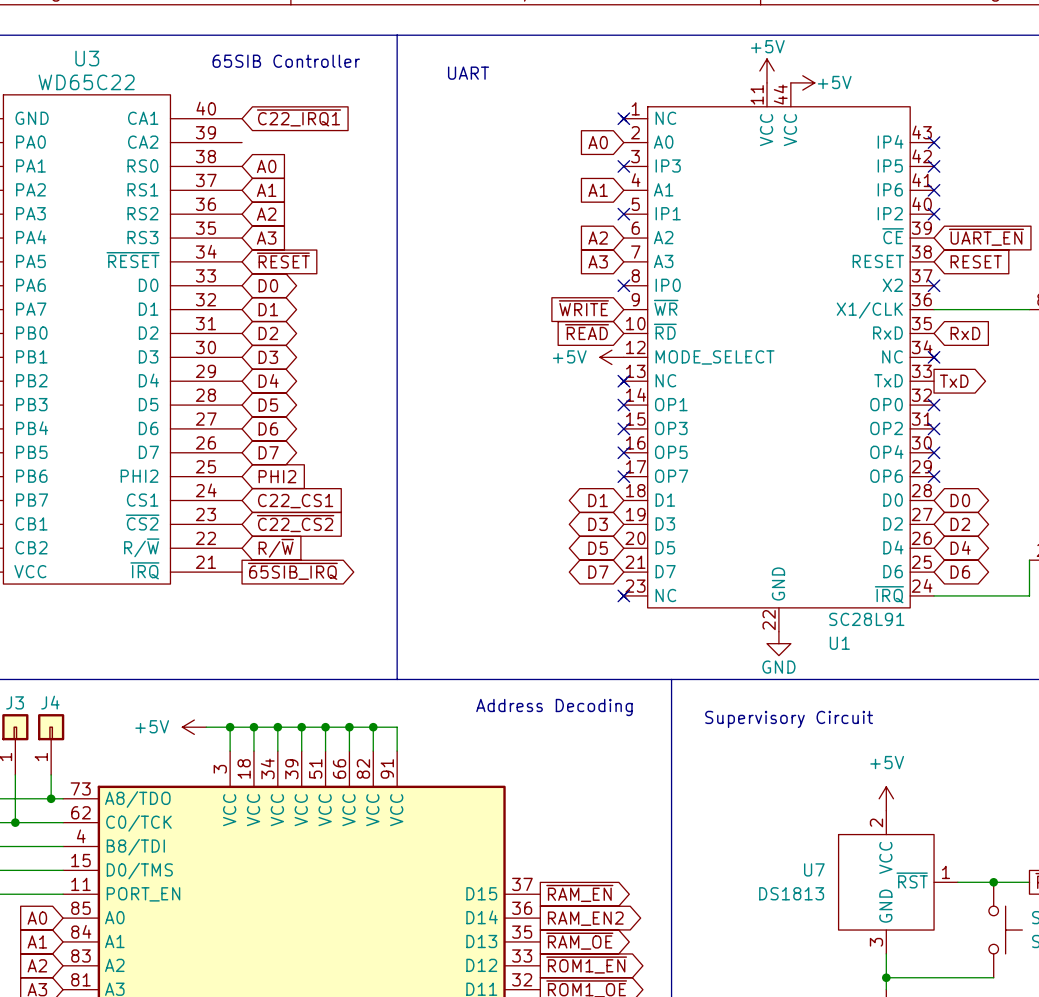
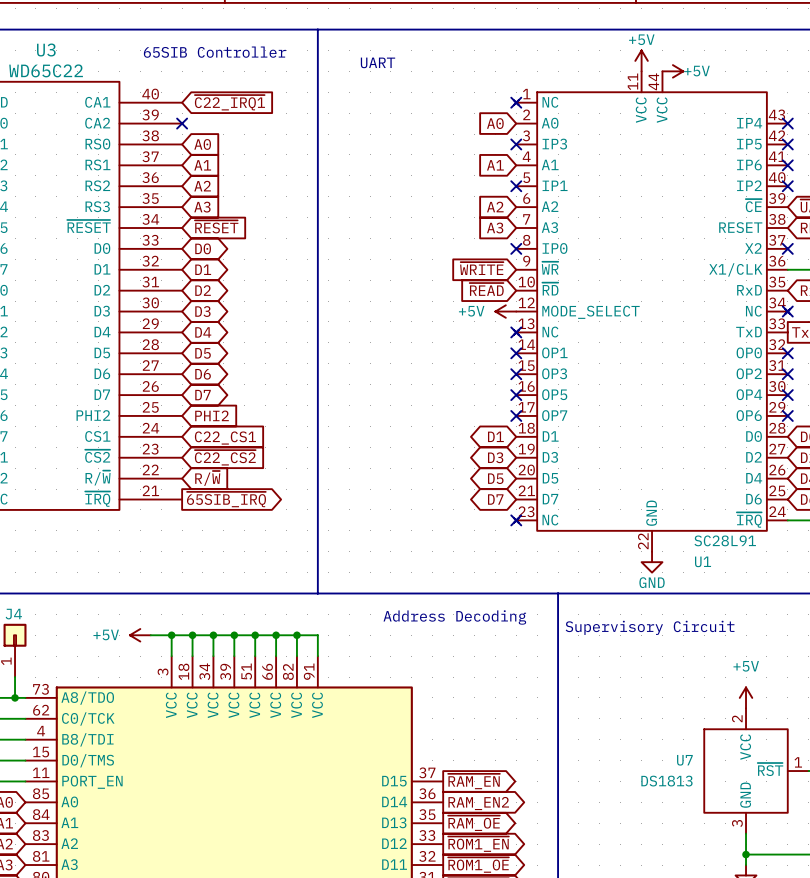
no-connect mark: none -> (182, 123)

